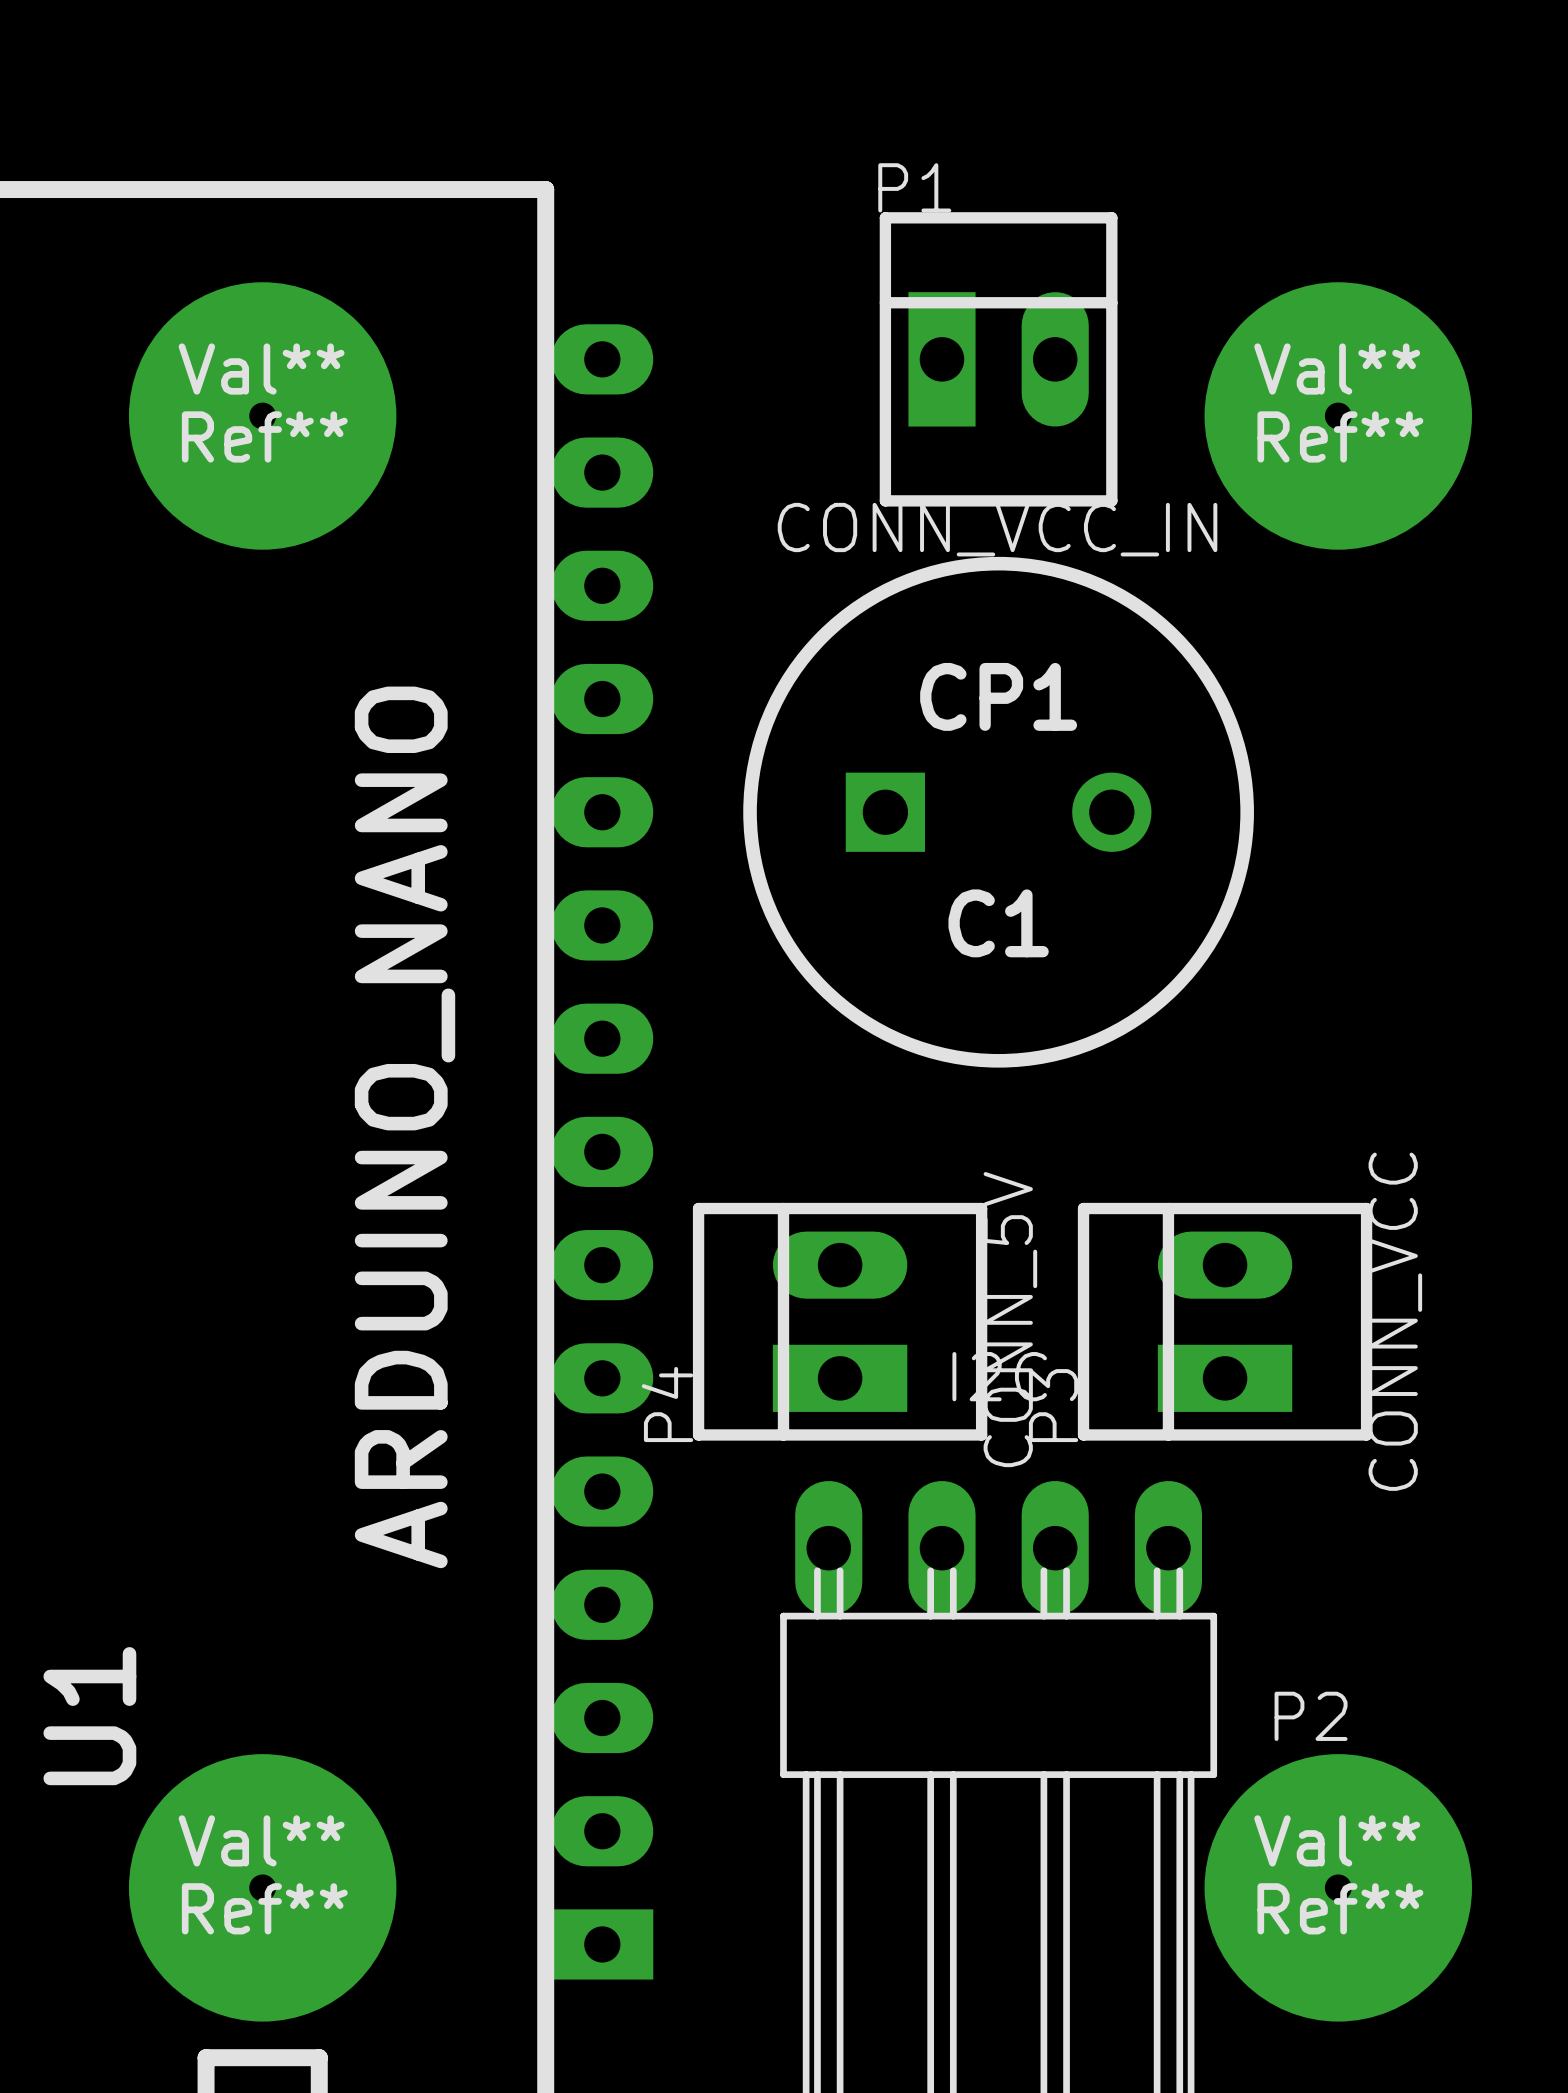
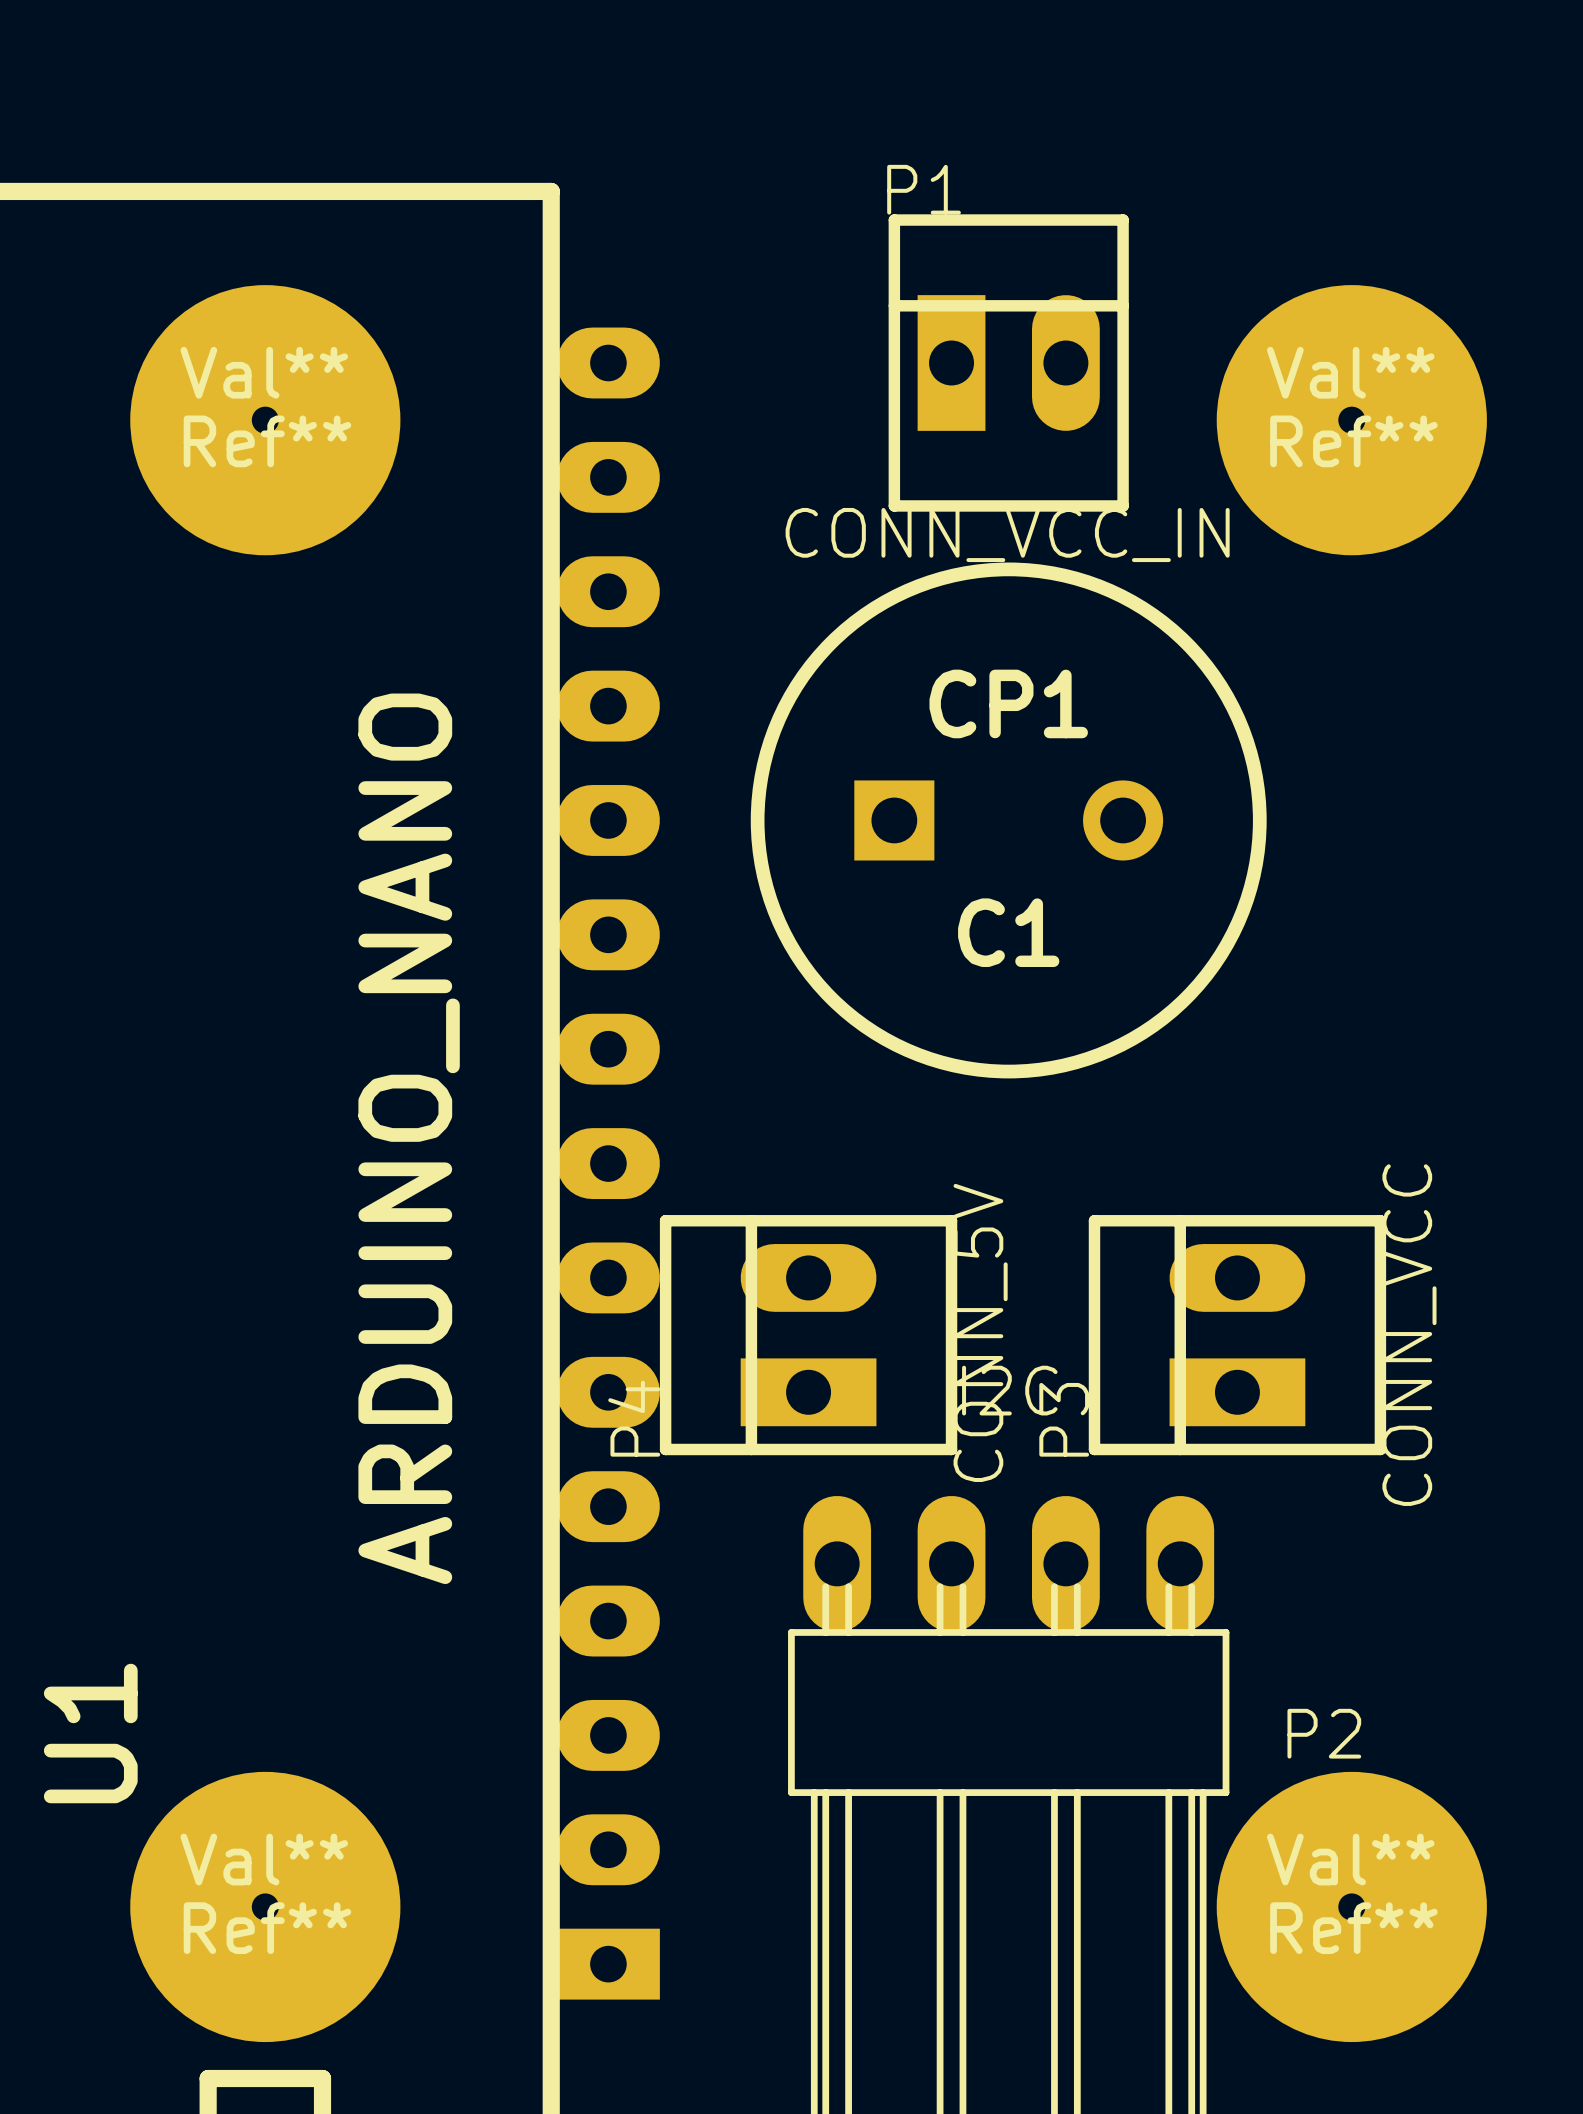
P4 position: (840, 1321) -> (808, 1335)

